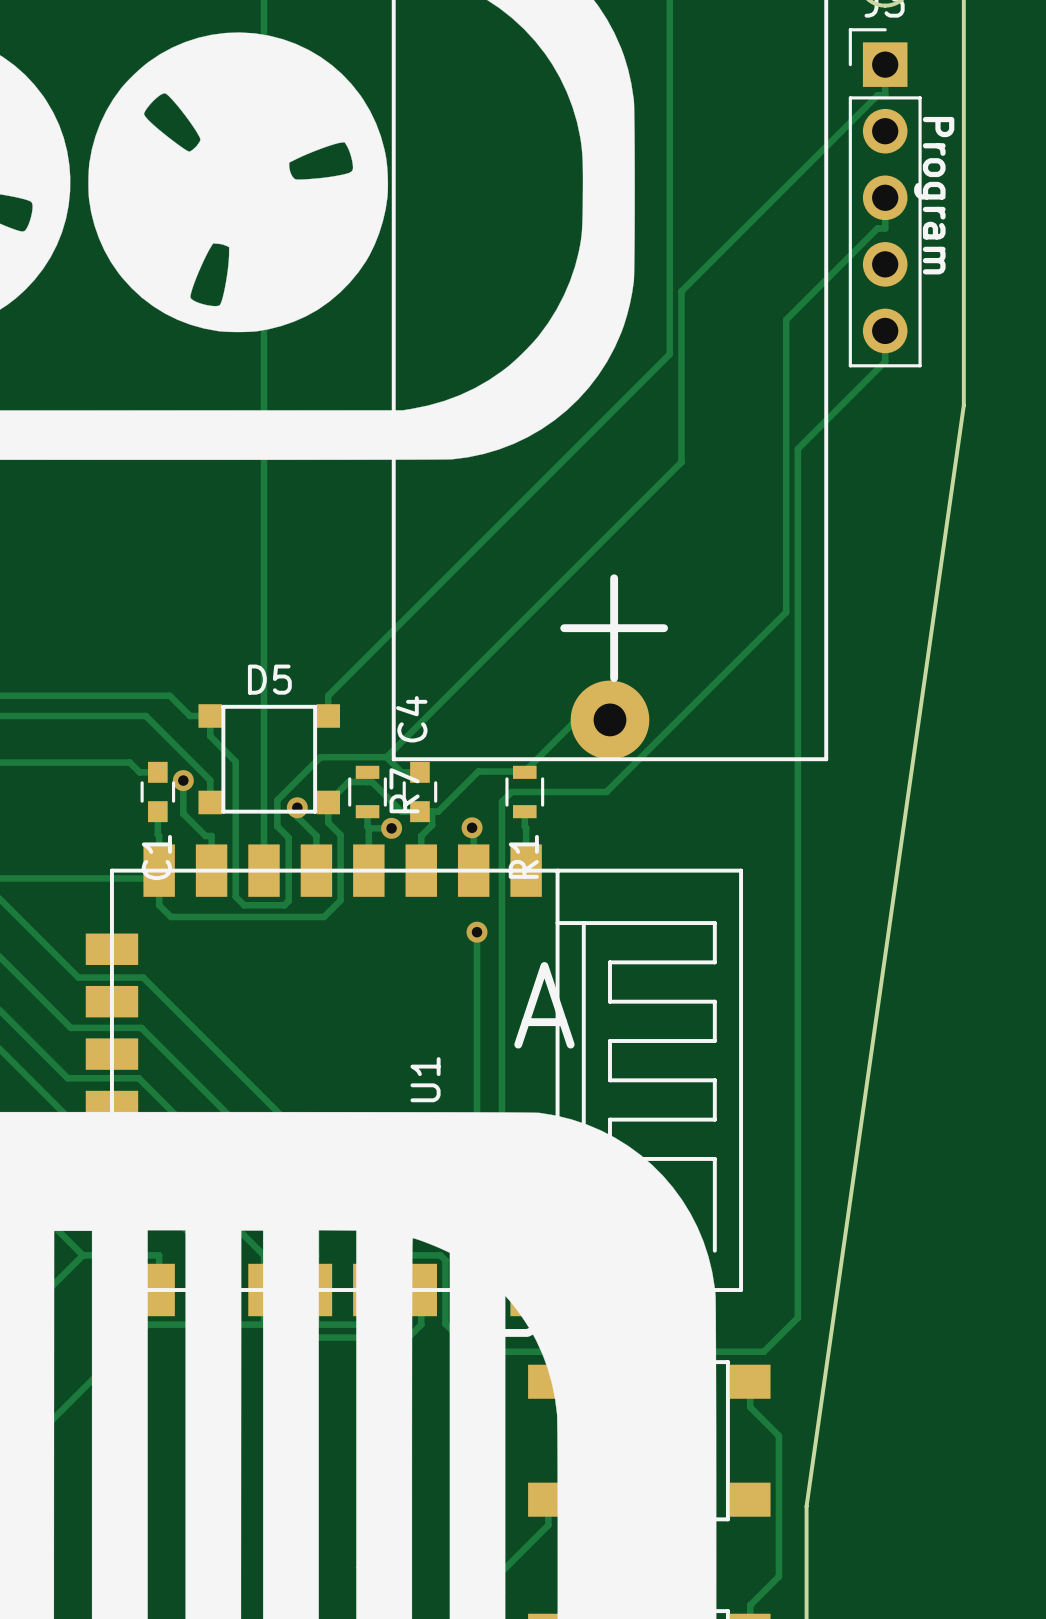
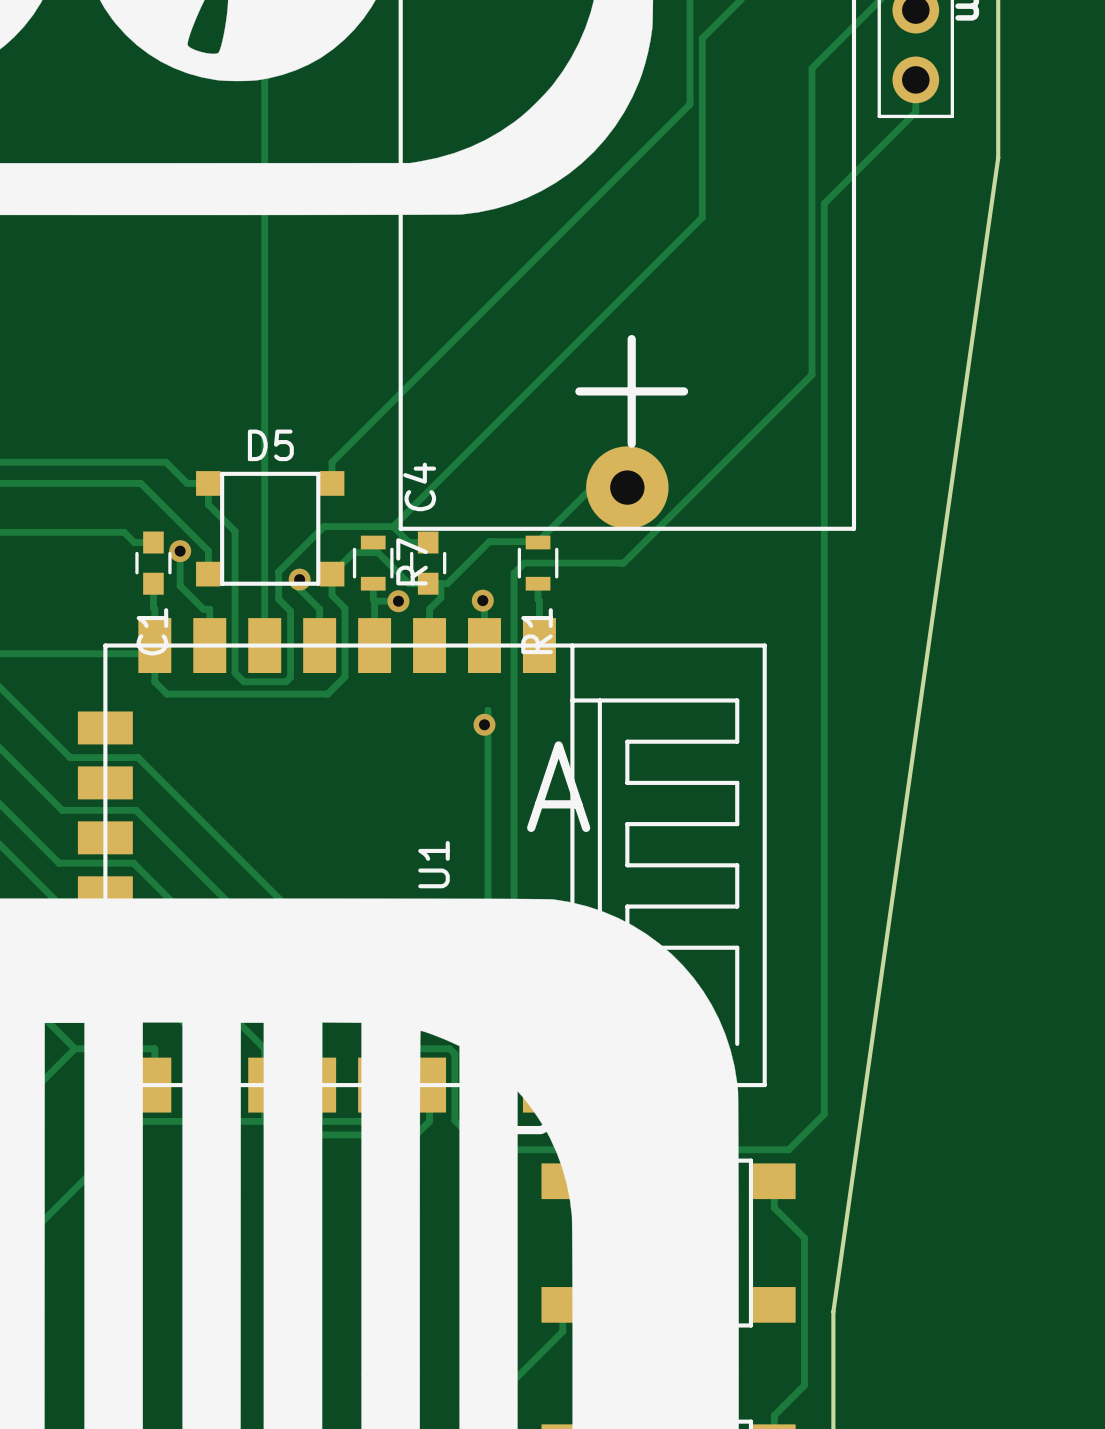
via position: (477, 932) -> (484, 724)

